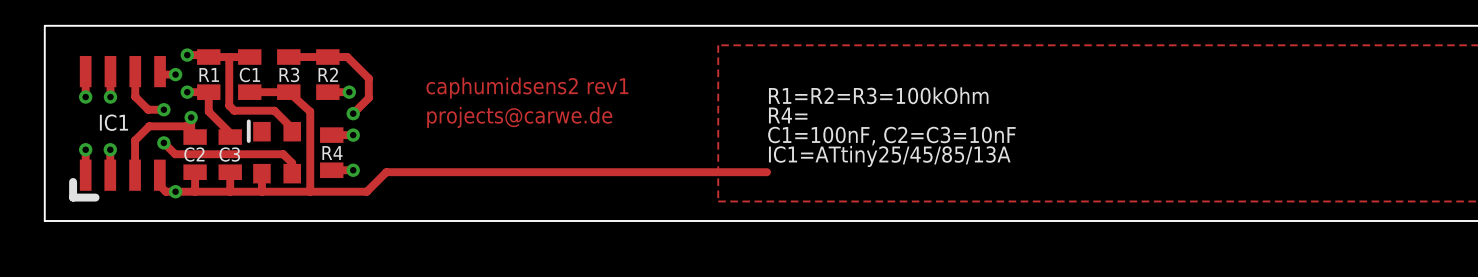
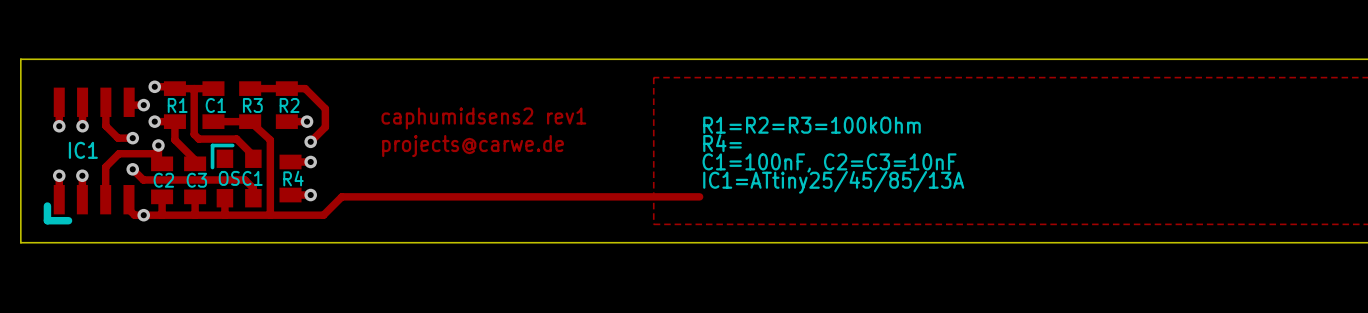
line: none -> (232, 145) (212, 145) (212, 149)
text: none -> OSC1 (240, 178)

